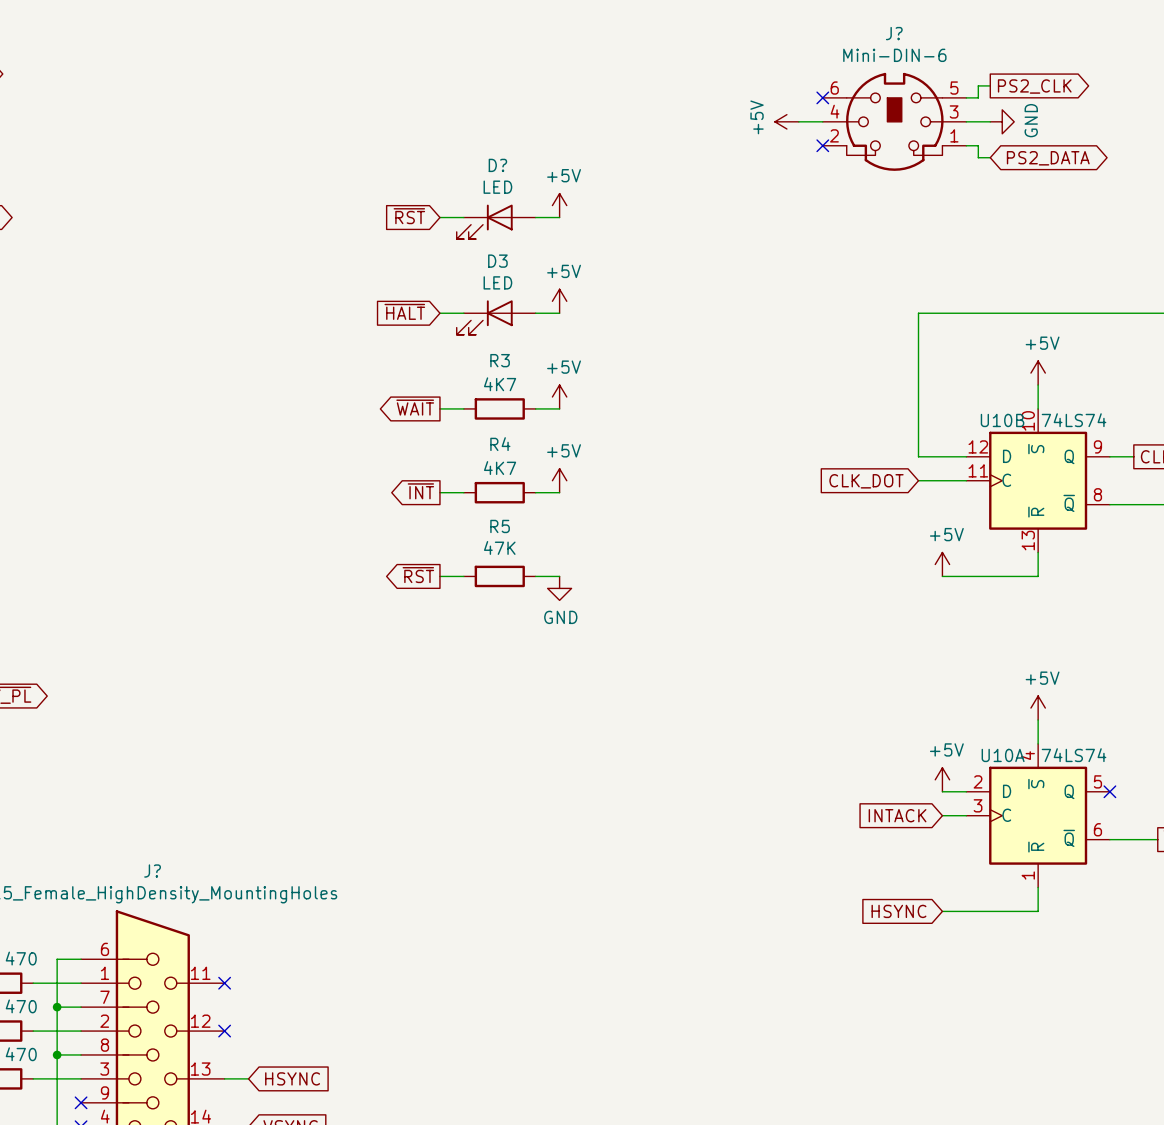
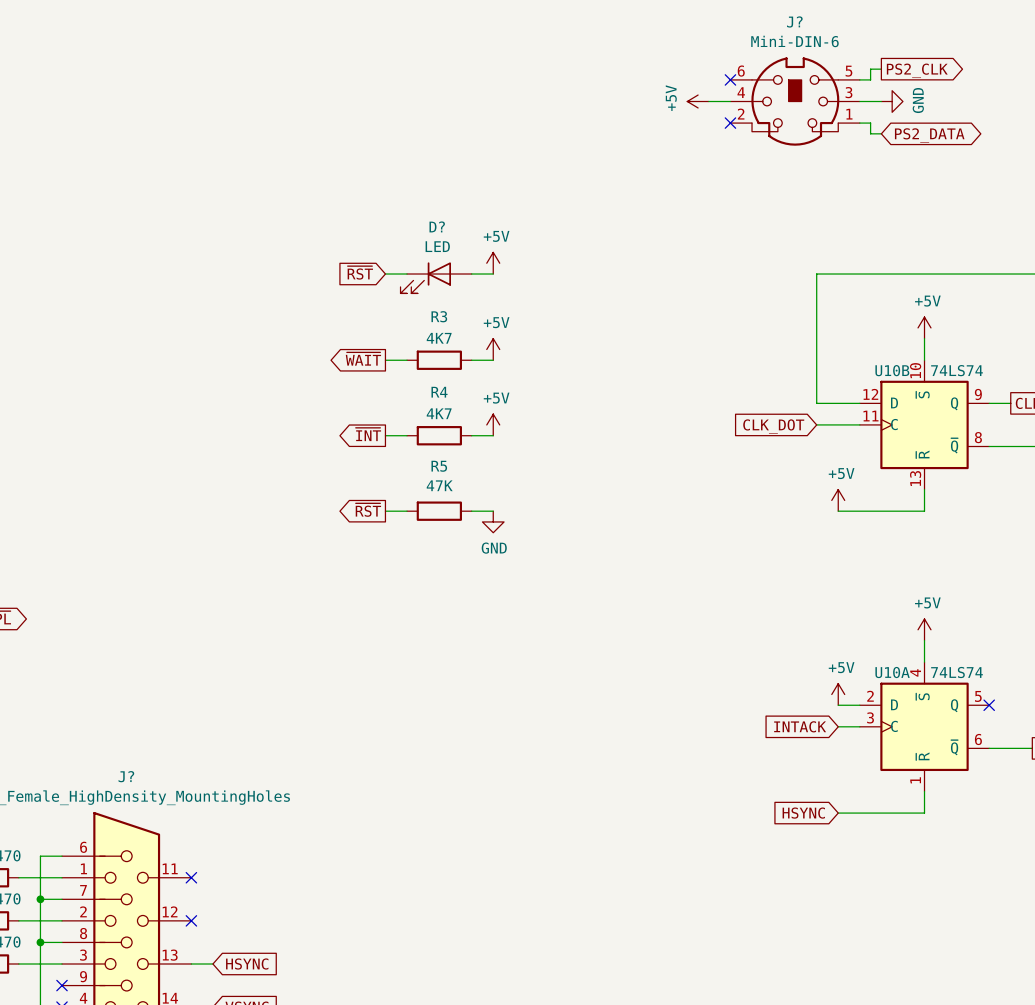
power symbol: +5V (559, 205) -> none
global label: ~{RST} (409, 216) -> none
wire: (439, 217) (463, 217) -> none
wire: (535, 217) (559, 217) -> none
D?: LED (496, 221) -> none
D3 name: D3 (497, 261) -> D? (437, 226)
global label: ~{HALT} (404, 311) -> ~{RST} (360, 272)

